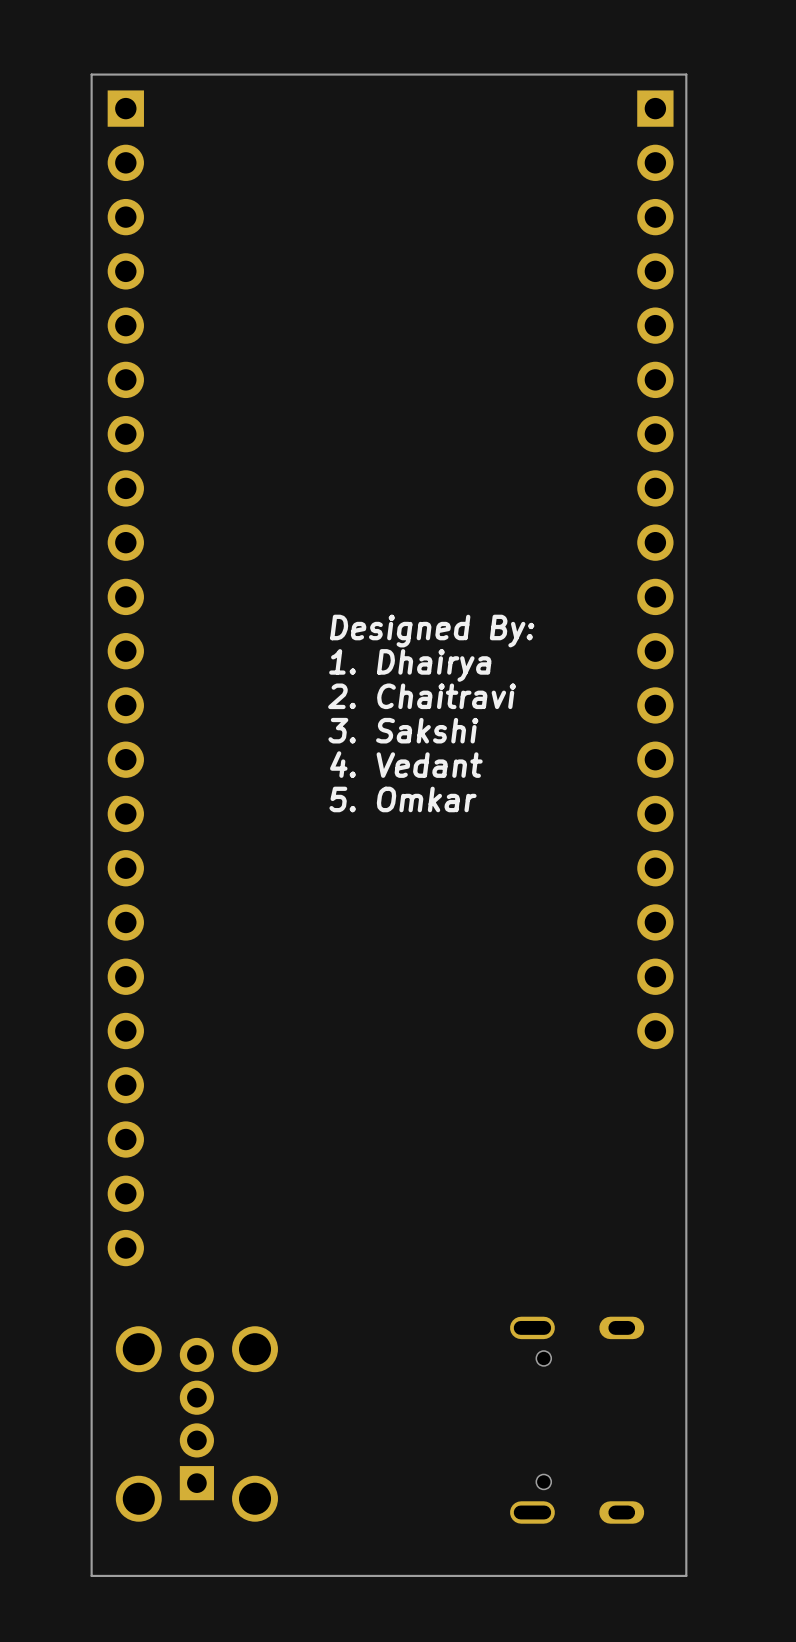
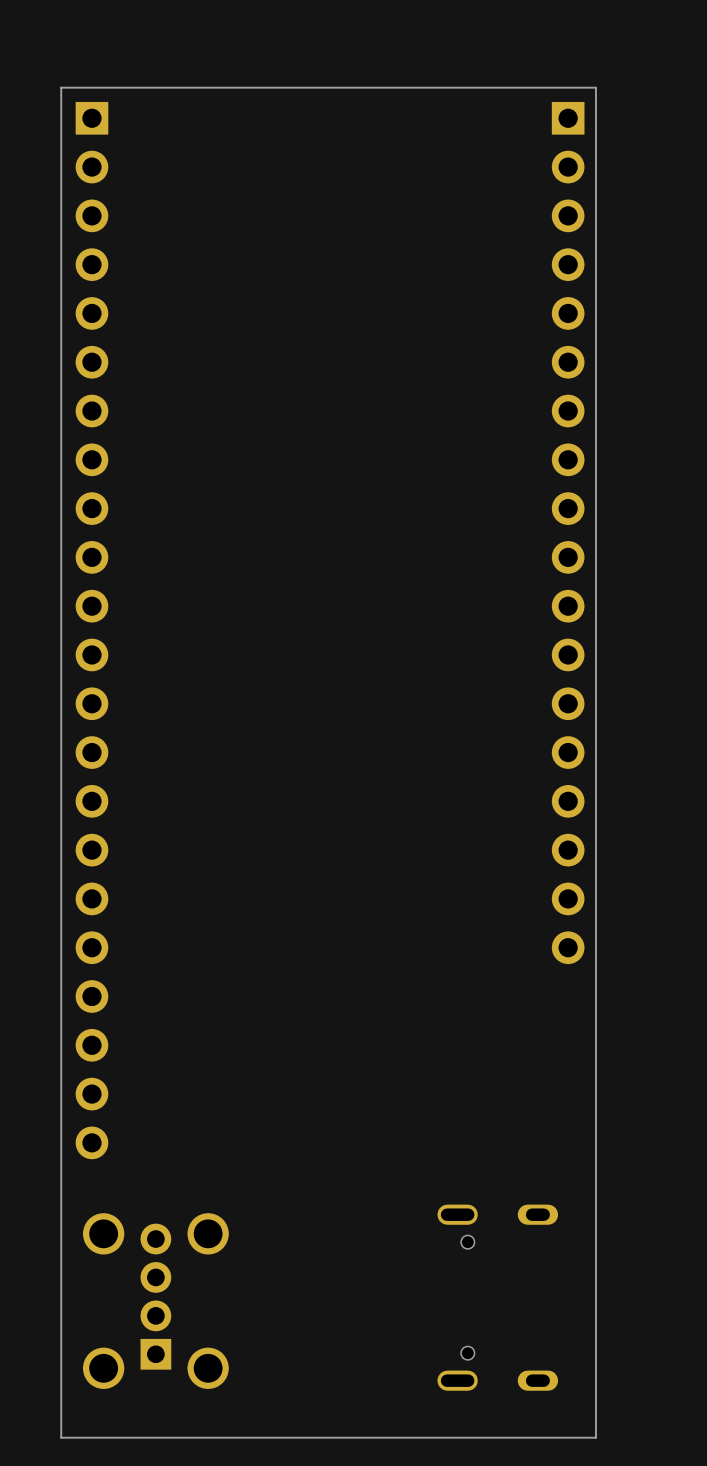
text: Designed By: (432, 631) -> none
text: 1. Dhairya (410, 665) -> none
text: 2. Chaitravi (422, 696) -> none
text: 3. Sakshi (403, 730) -> none
text: 4. Vedant (406, 764) -> none
text: 5. Omkar (403, 799) -> none

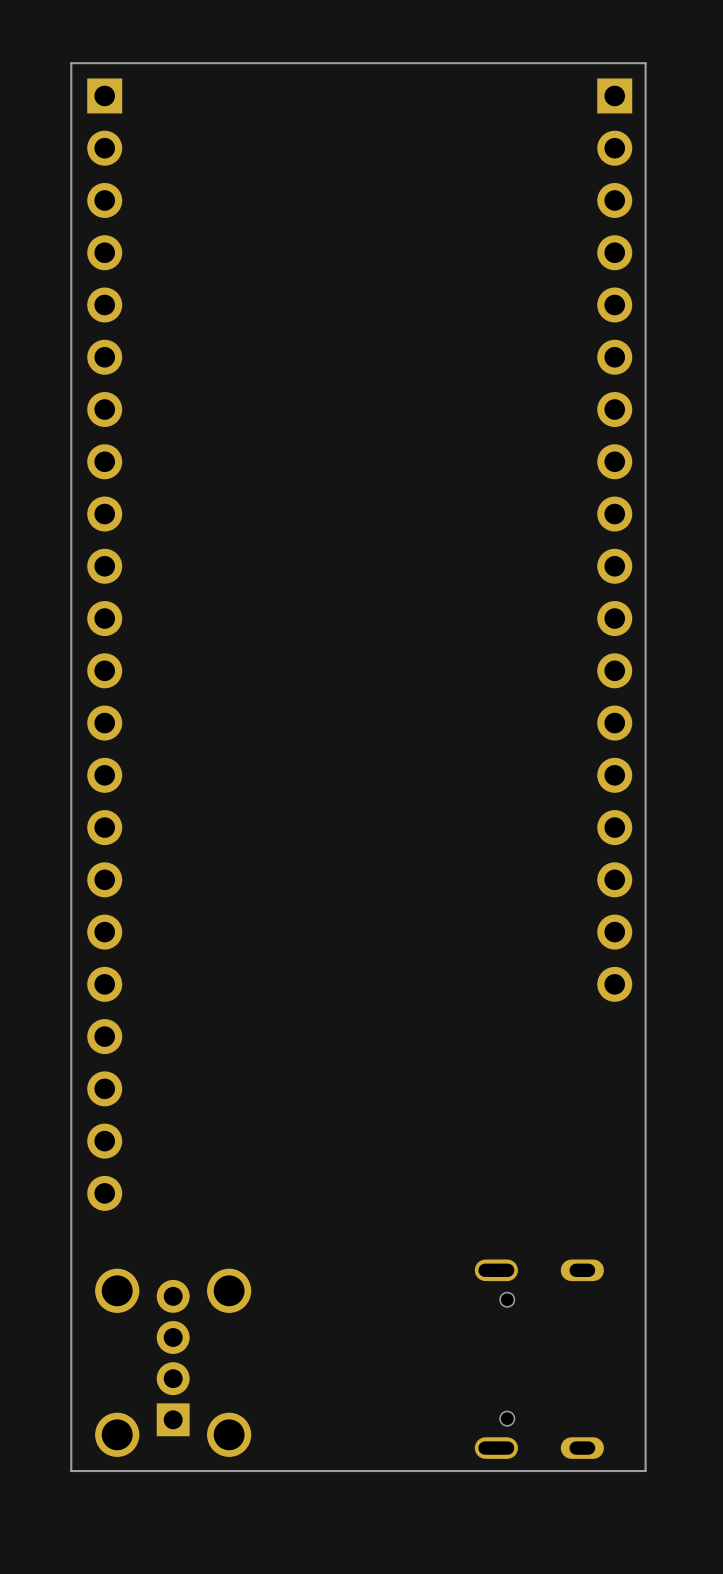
board edge: (595, 87) (595, 1437) (61, 1437) (61, 87) -> (644, 63) (645, 1471) (71, 1471) (71, 63)

